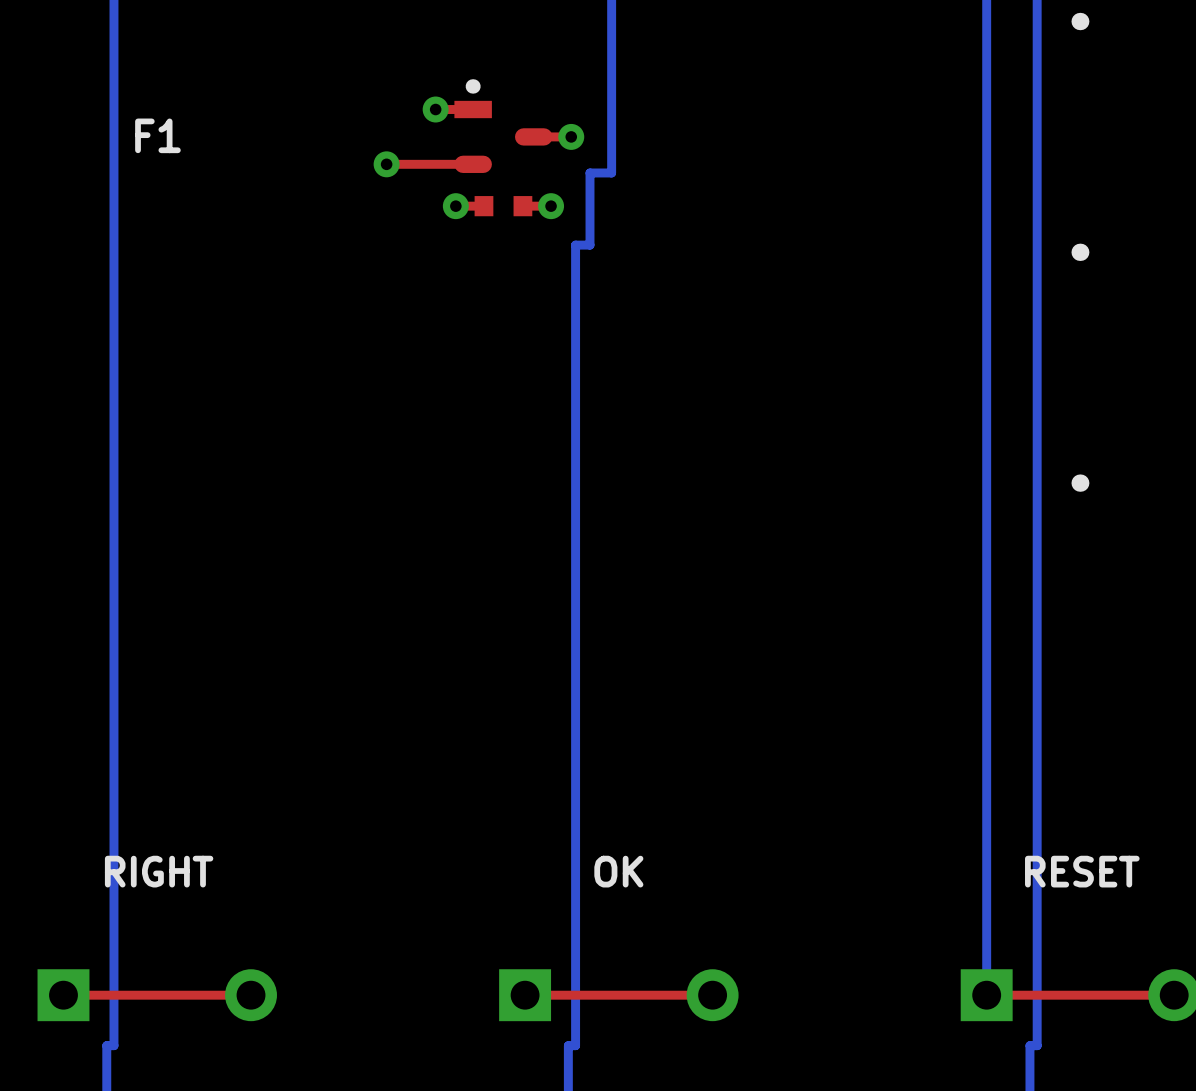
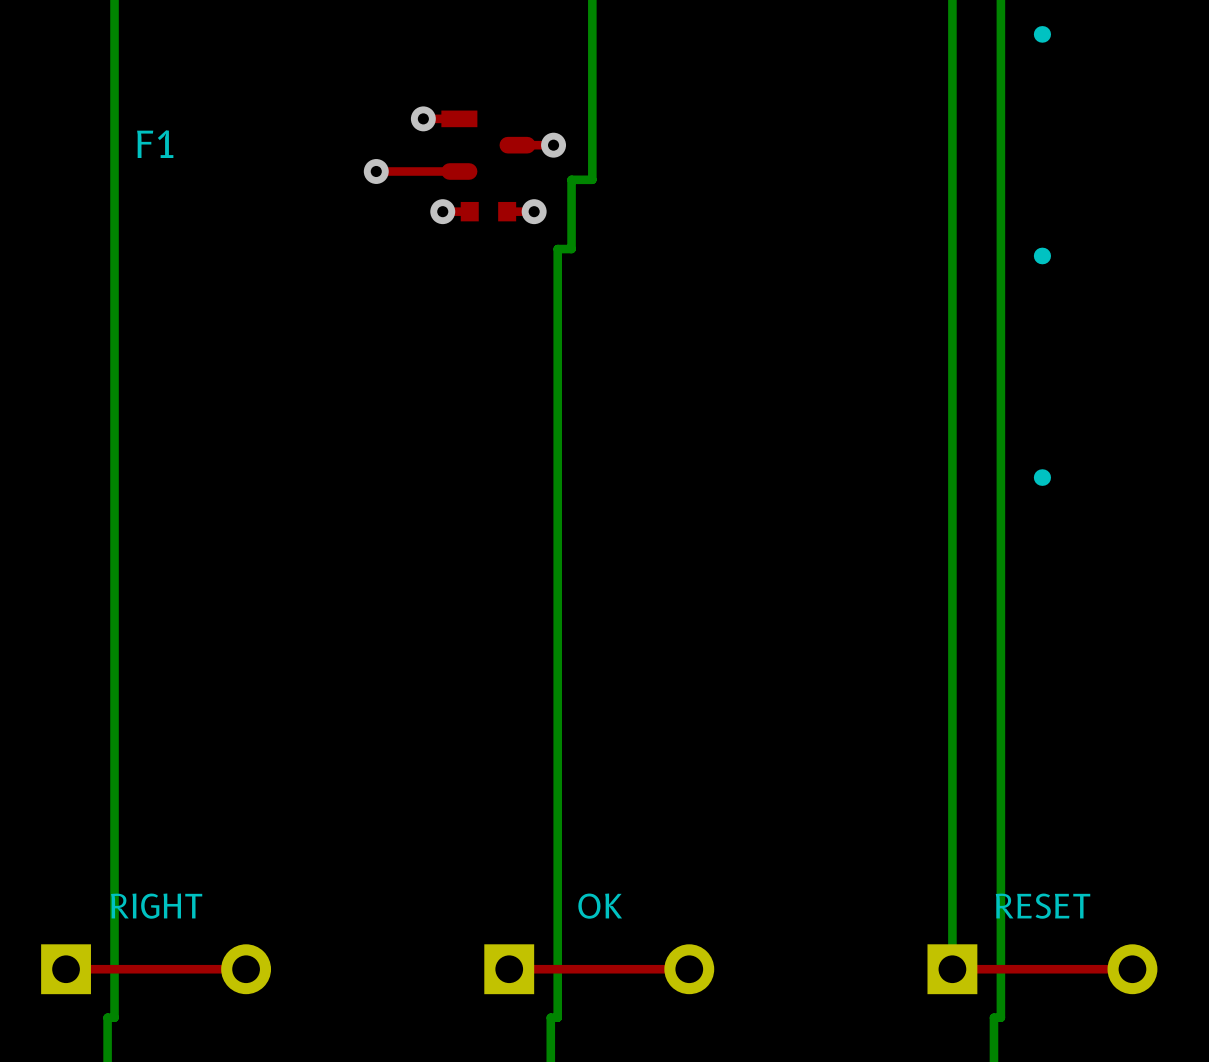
part footprint: [454, 79, 553, 173] -> [441, 110, 536, 180]
text position: RIGHT (159, 871) -> RIGHT (156, 906)
text position: OK (618, 871) -> OK (600, 906)
text position: RESET (1082, 871) -> RESET (1043, 906)

